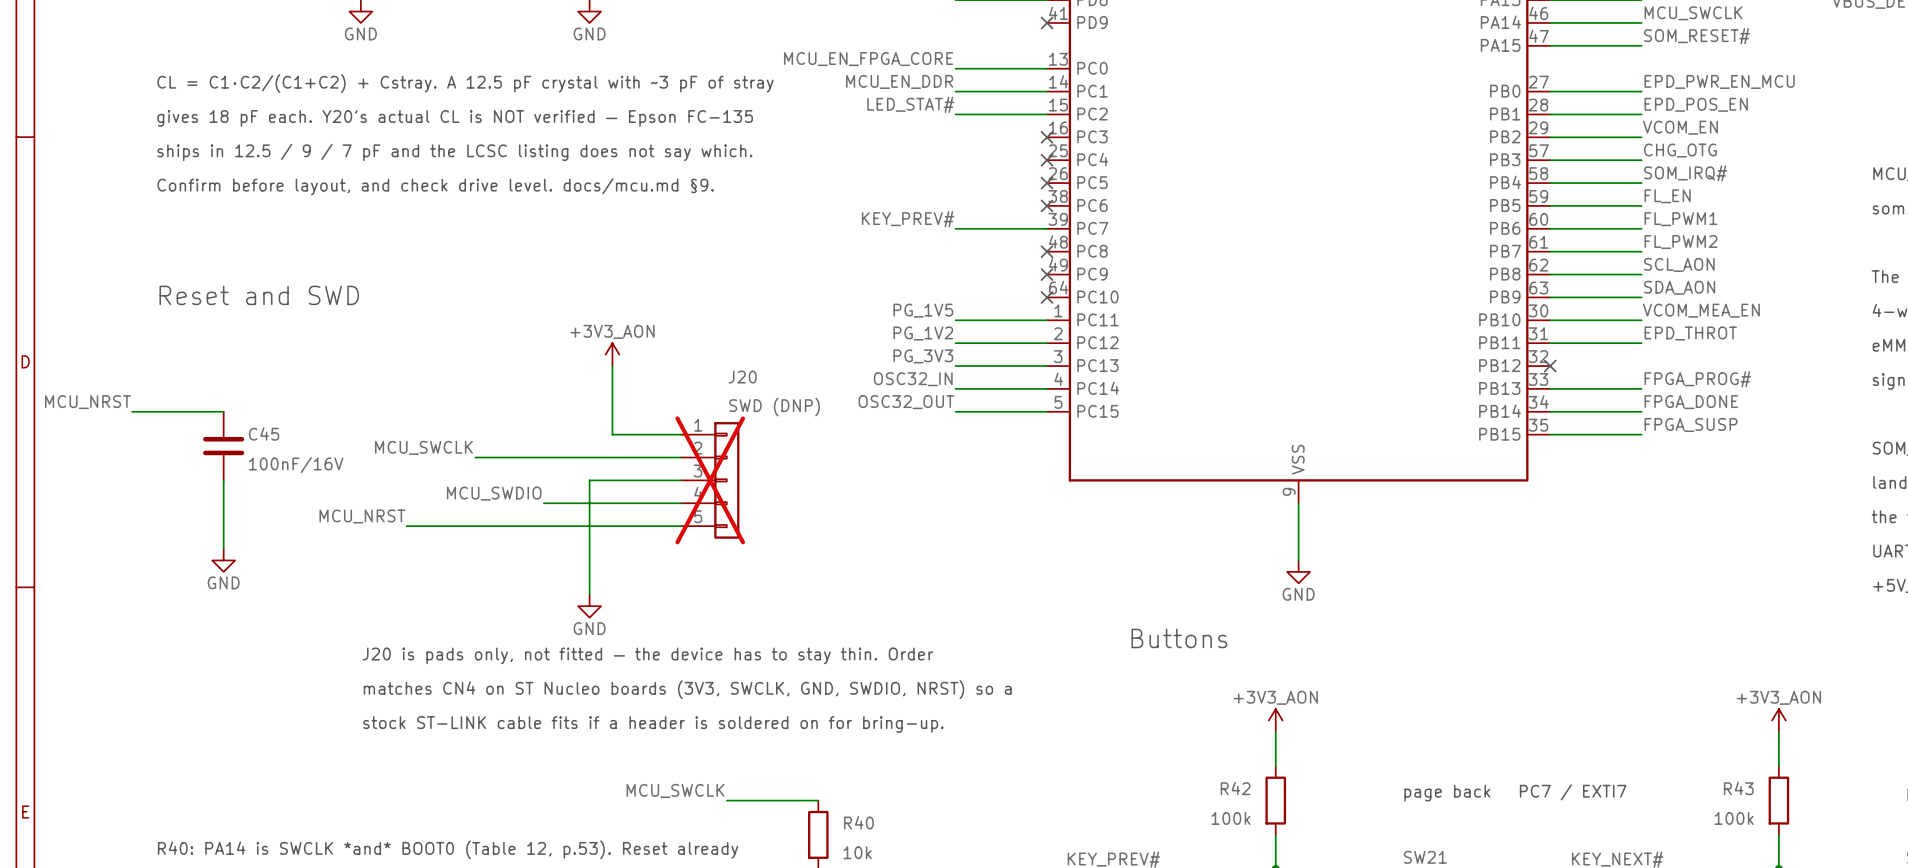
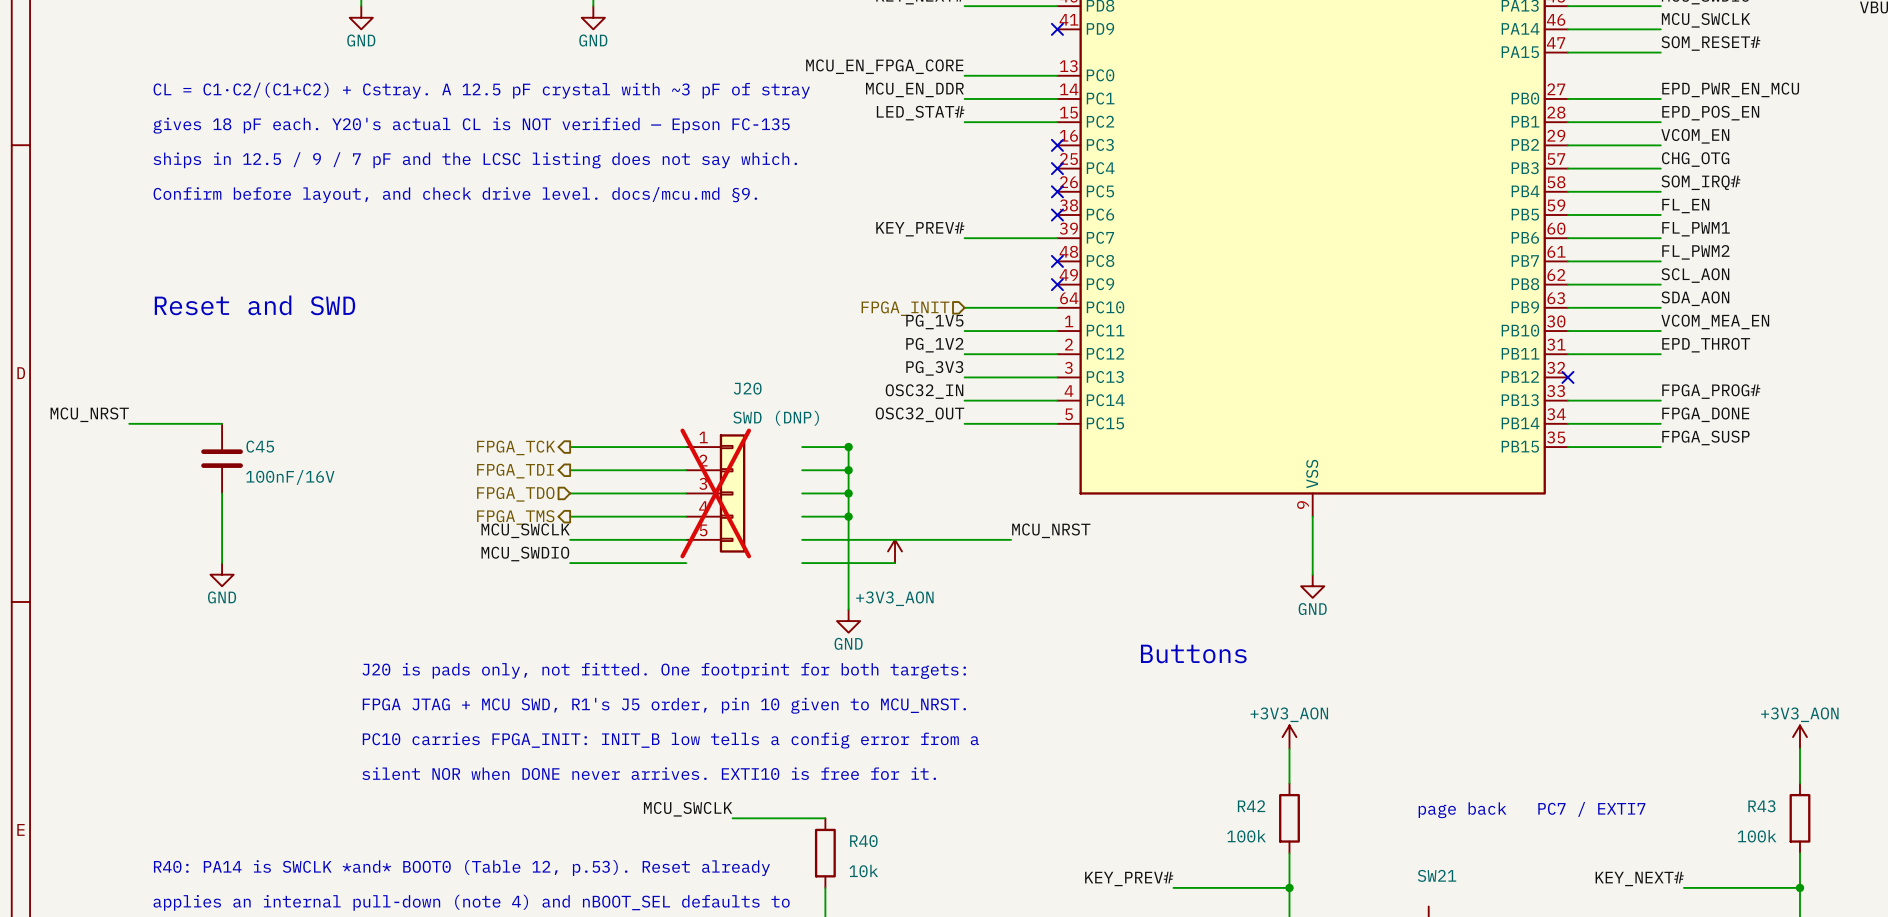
hierarchical label: none -> FPGA_INIT (905, 308)
wire: none -> (964, 307) (1057, 307)
no-connect mark: (1047, 297) -> none
power symbol: +3V3_AON (612, 354) -> none
wire: (612, 366) (612, 434) -> (570, 447) (616, 447)
hierarchical label: none -> FPGA_TCK (516, 447)
wire: none -> (802, 447) (848, 447) (848, 609)
junction: none -> (848, 447)
label position: MCU_SWCLK (423, 447) -> MCU_SWCLK (525, 530)
wire: (475, 457) (566, 457) -> none
hierarchical label: none -> FPGA_TDI (515, 471)
wire: none -> (802, 470) (848, 470)
junction: none -> (848, 470)
hierarchical label: none -> FPGA_TDO (515, 494)
wire: (589, 480) (589, 594) -> (593, 493) (570, 493)
wire: none -> (802, 493) (848, 493)
junction: none -> (848, 493)
label position: MCU_SWDIO (494, 493) -> MCU_SWDIO (525, 554)
hierarchical label: none -> FPGA_TMS (515, 517)
wire: (543, 503) (566, 503) -> none
wire: none -> (802, 516) (848, 516)
junction: none -> (848, 516)
label: MCU_NRST (362, 516) -> none
label: none -> MCU_NRST (1051, 530)
wire: (406, 526) (566, 526) -> none
wire: none -> (802, 539) (1011, 539)
power symbol: none -> +3V3_AON (895, 551)
wire: none -> (570, 563) (686, 563)
wire: none -> (802, 563) (895, 563)
power symbol: GND (589, 606) -> none
power symbol: none -> GND (848, 621)
text: J20 is pads only, not fitted — the device has to stay thin. Order (647, 655) -> J20 is pads only, not fitted. One footprint for both targets: (664, 670)
text: matches CN4 on ST Nucleo boards (3V3, SWCLK, GND, SWDIO, NRST) so a (687, 689) -> FPGA JTAG + MCU SWD, R1's J5 order, pin 10 given to MCU_NRST. (664, 705)
text: stock ST-LINK cable fits if a header is soldered on for bring-up. (653, 724) -> PC10 carries FPGA_INIT: INIT_B low tells a config error from a (670, 740)
text: none -> silent NOR when DONE never arrives. EXTI10 is free for it. (649, 773)

